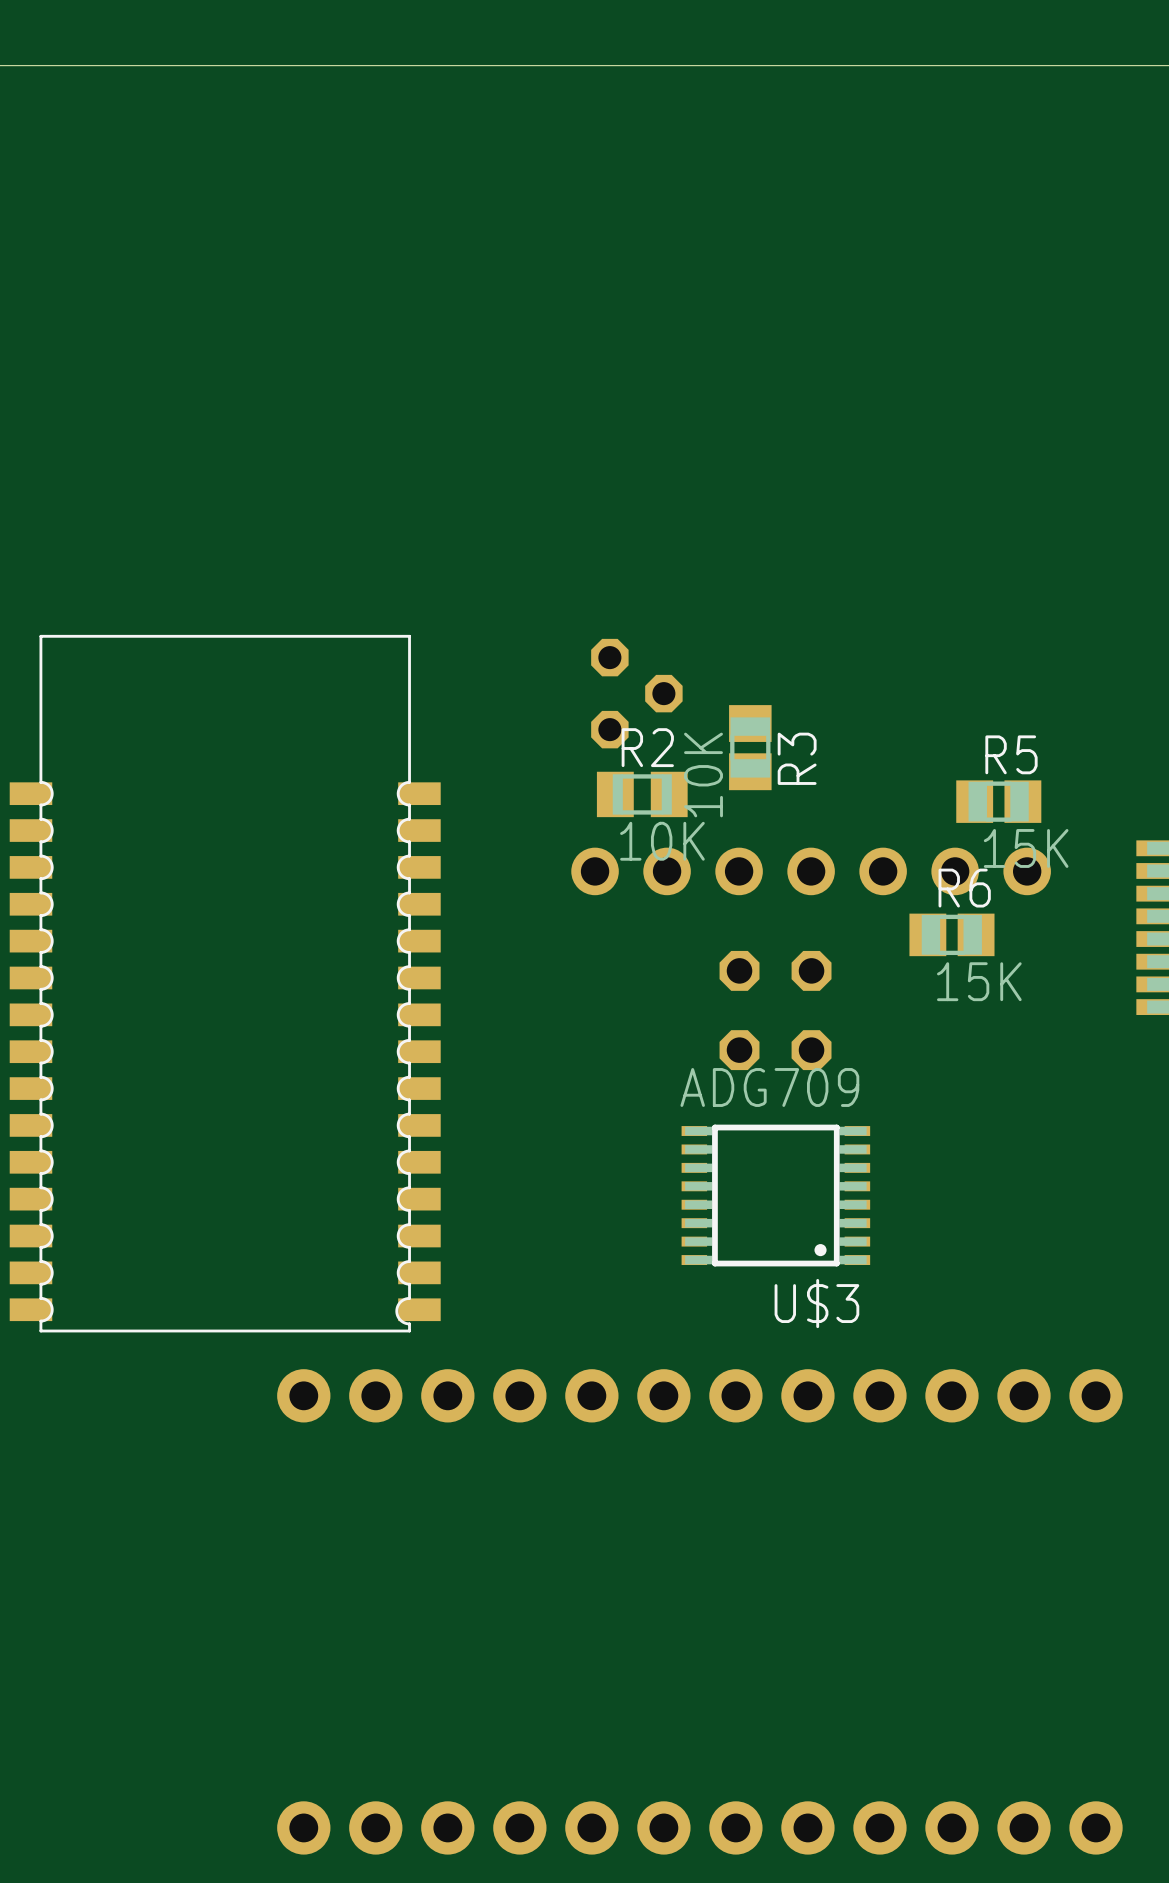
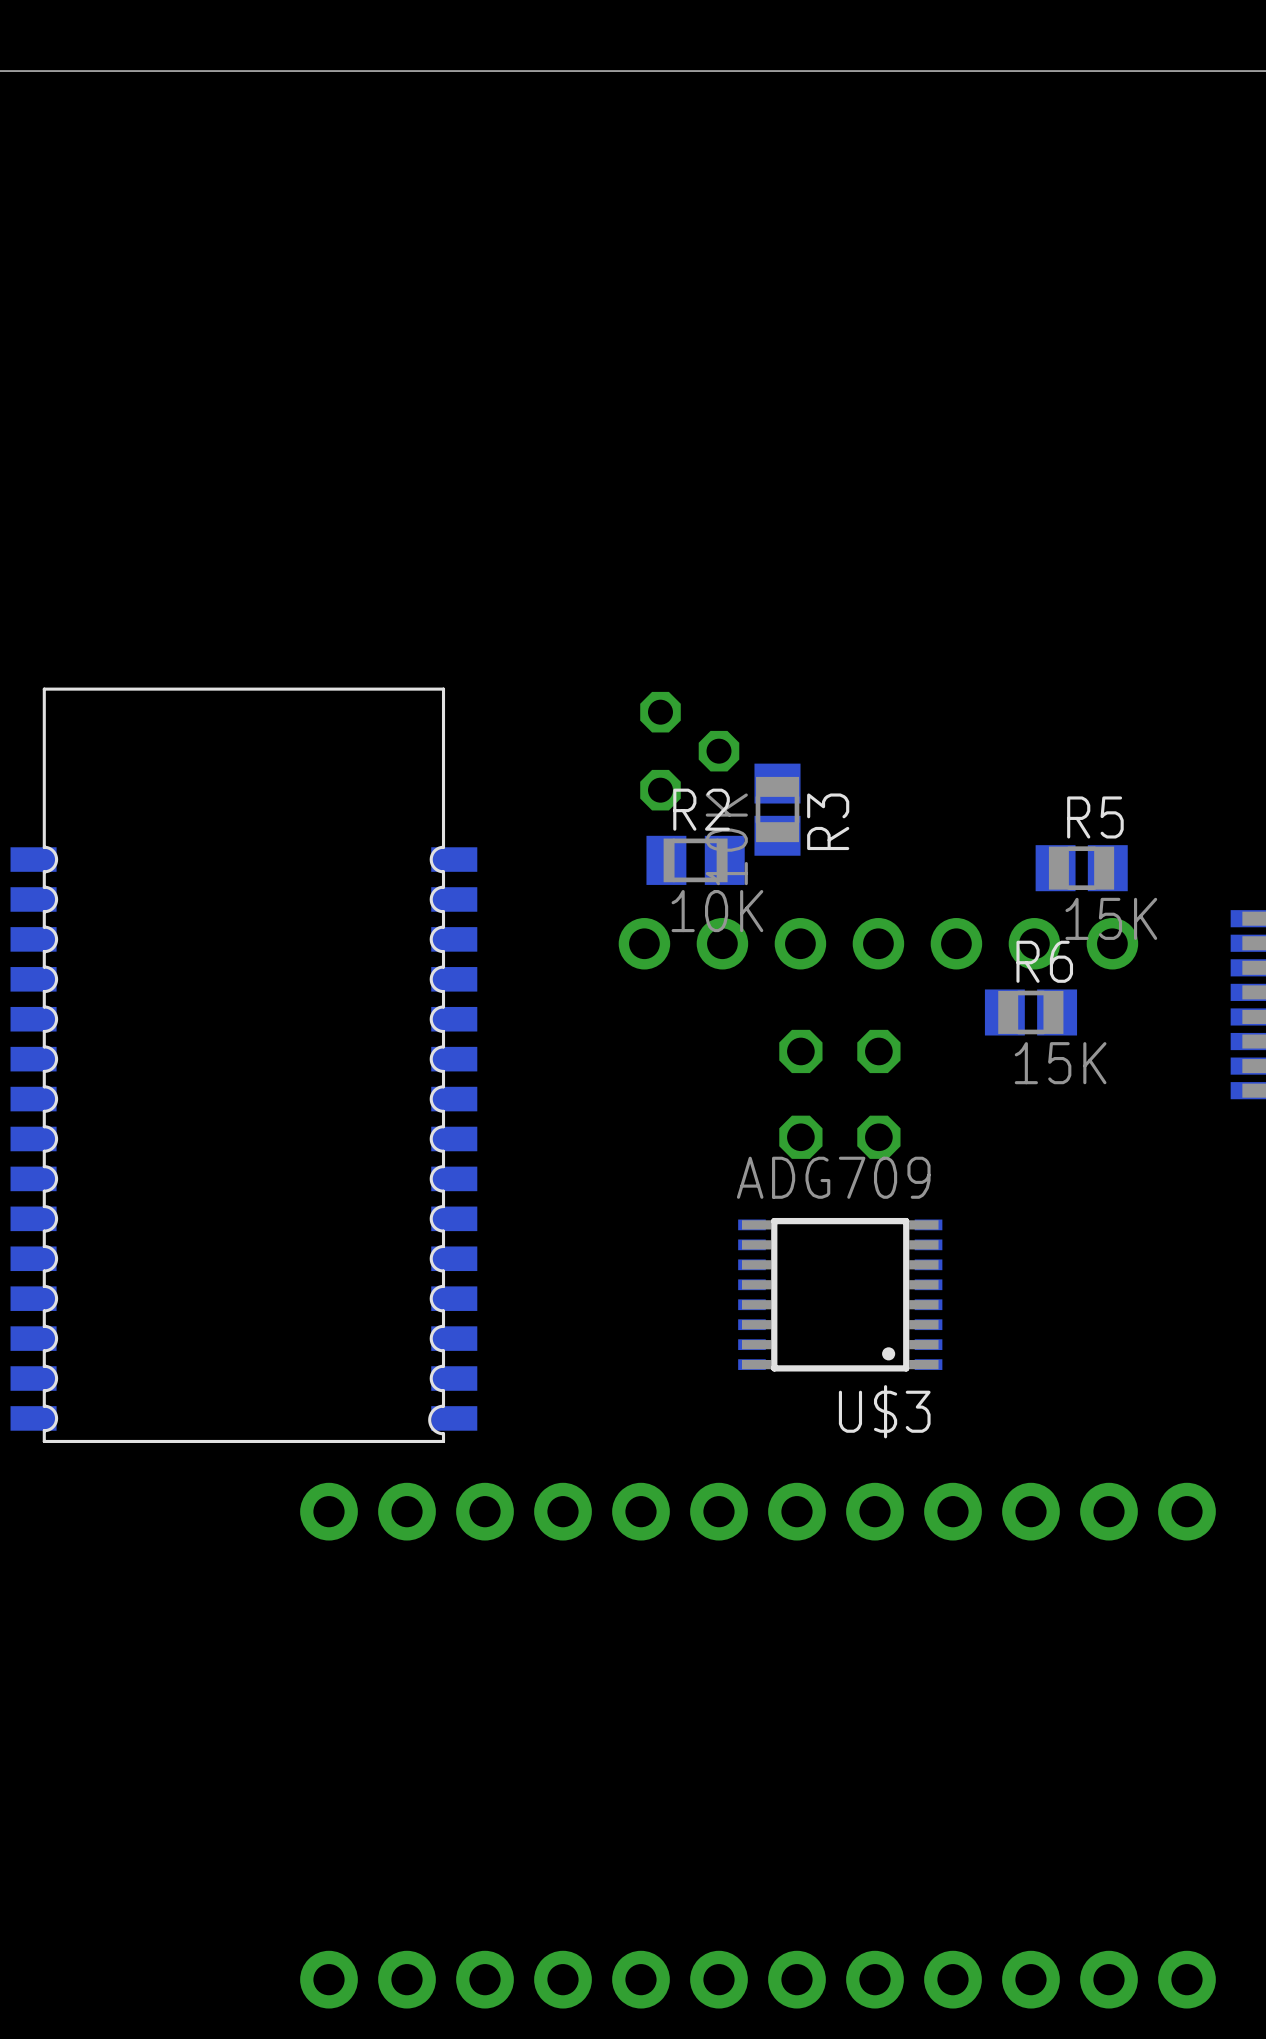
R3 position: (750, 747) -> (777, 809)

